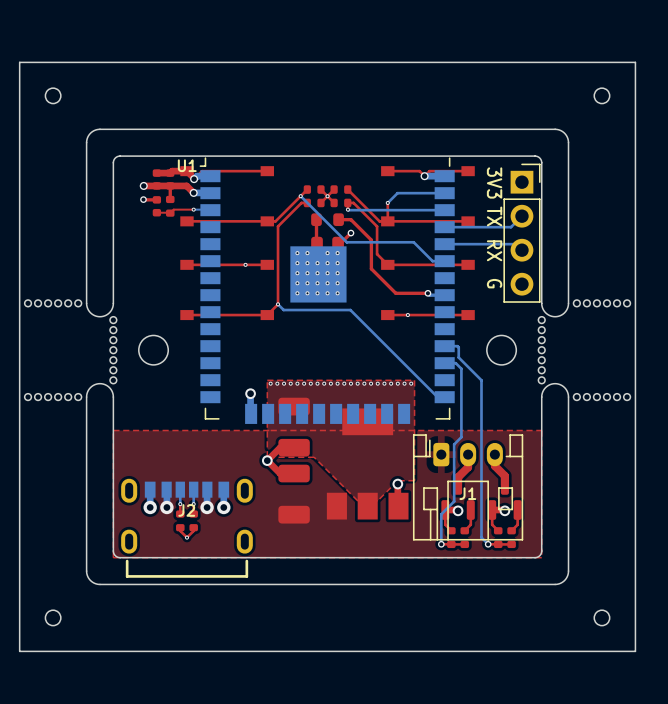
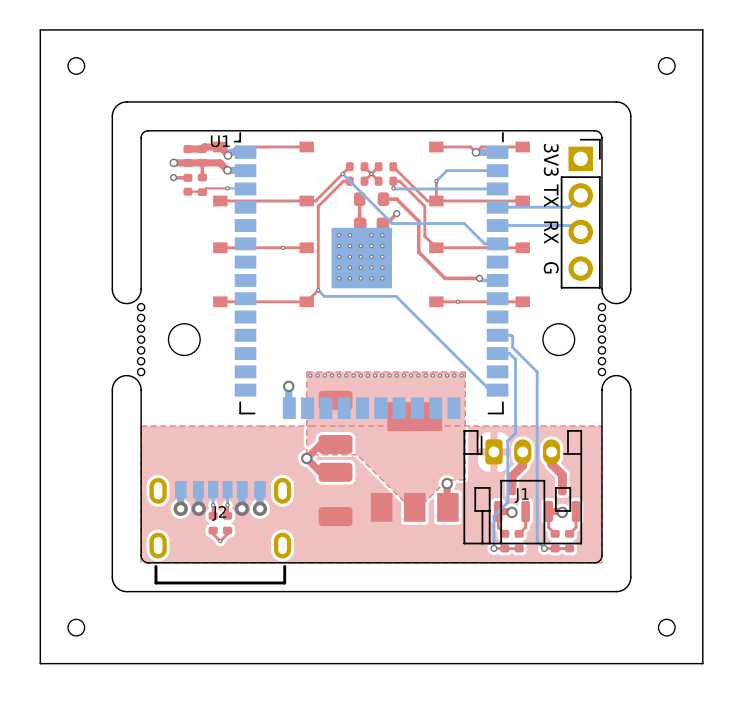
part: (53, 303) -> none
part: (601, 303) -> none
part: (53, 397) -> none
part: (601, 397) -> none

